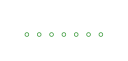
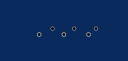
via: none -> (52, 28)
via: none -> (74, 28)
via: none -> (95, 28)
via: (26, 34) -> none
via: (51, 34) -> none
via: (76, 34) -> none
via: (100, 34) -> none

